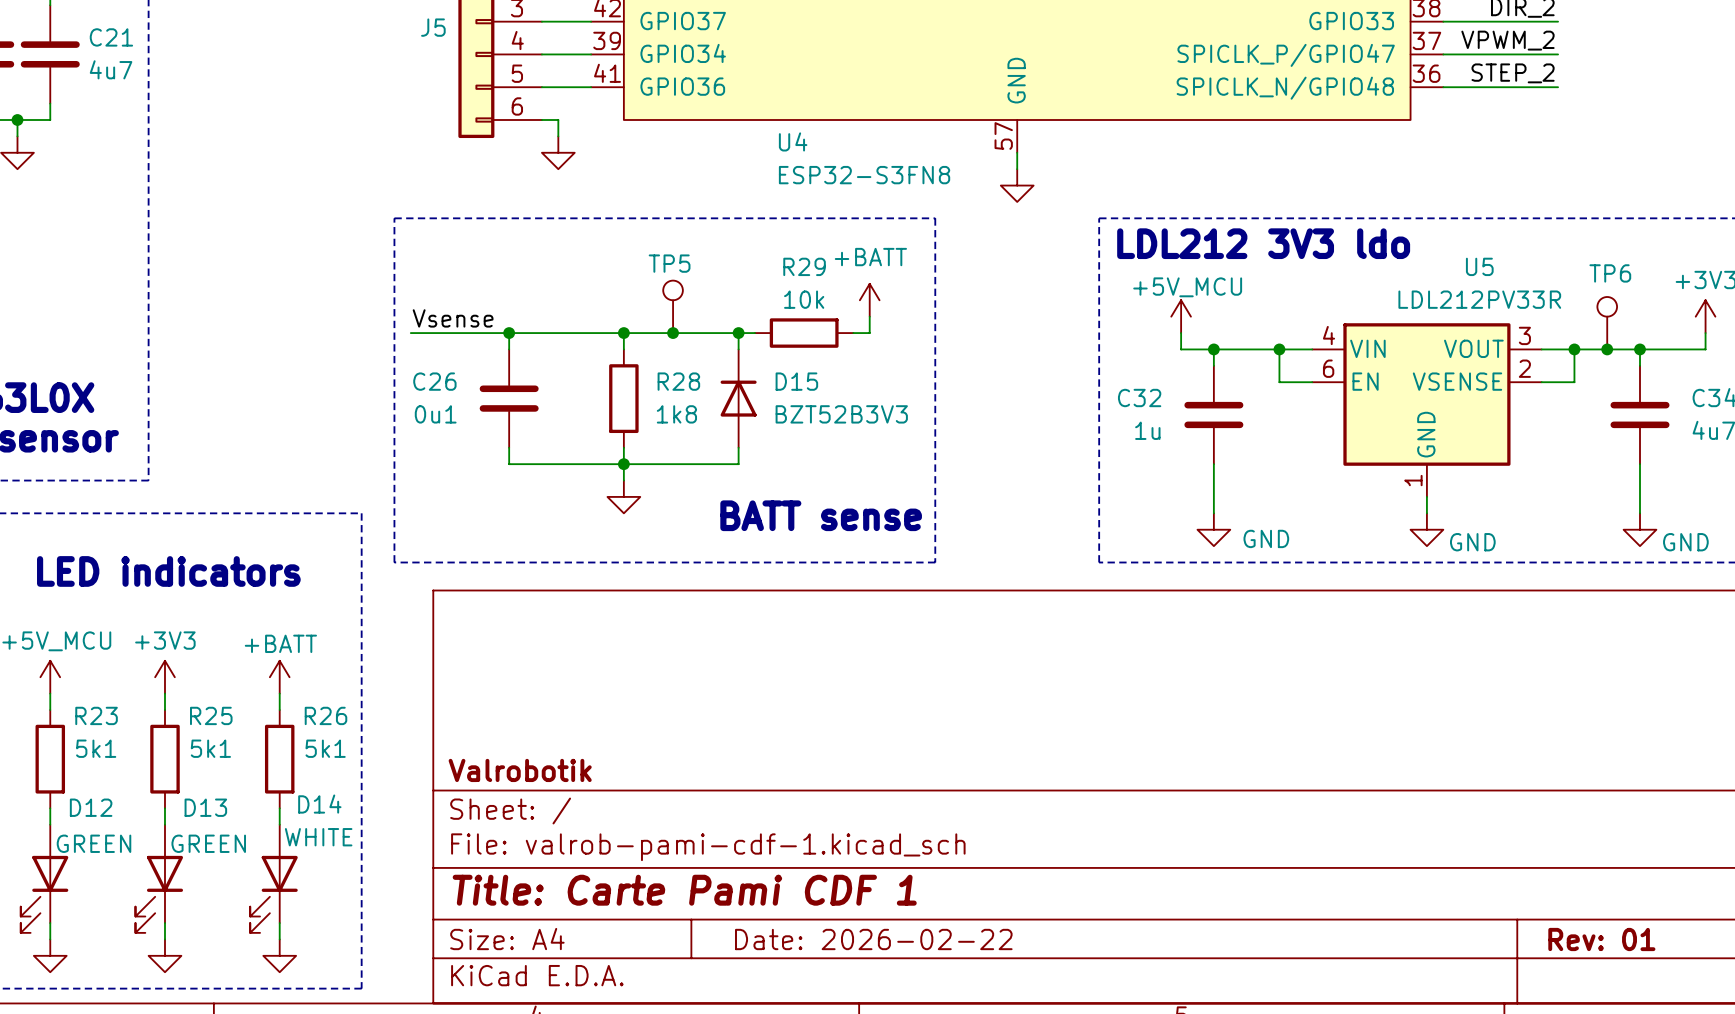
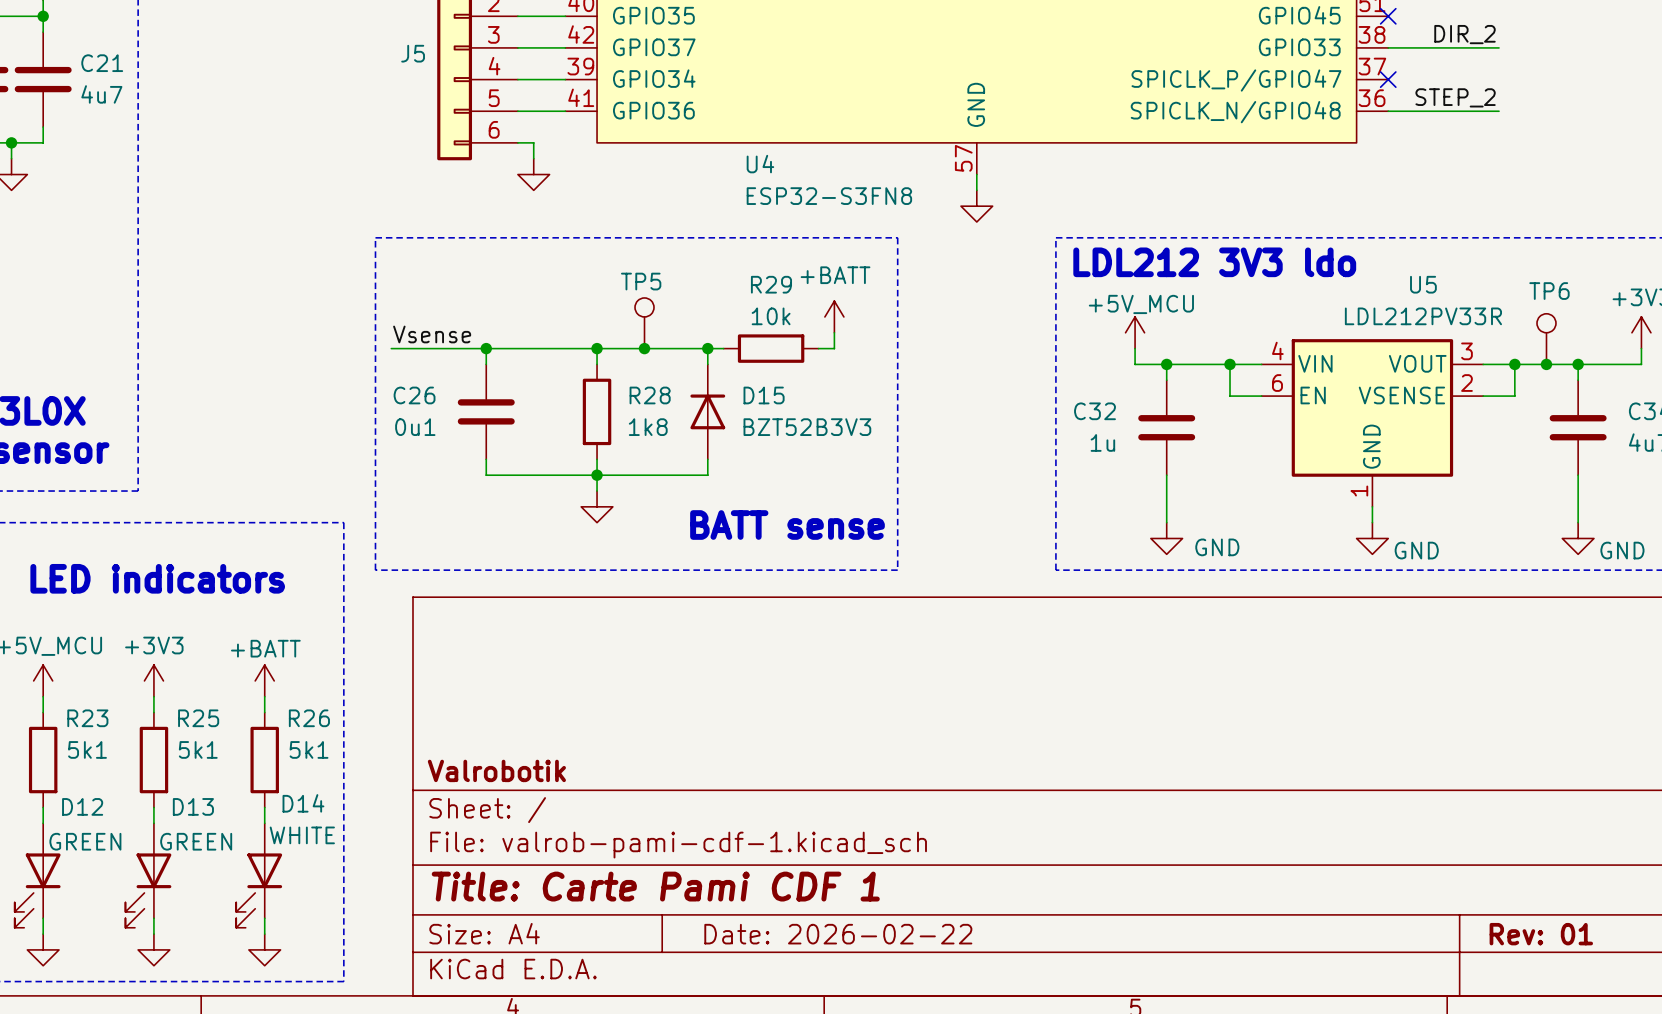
label: VPWM_2 (1507, 40) -> none
wire: (1443, 54) (1558, 54) -> none
no-connect mark: none -> (1388, 79)

